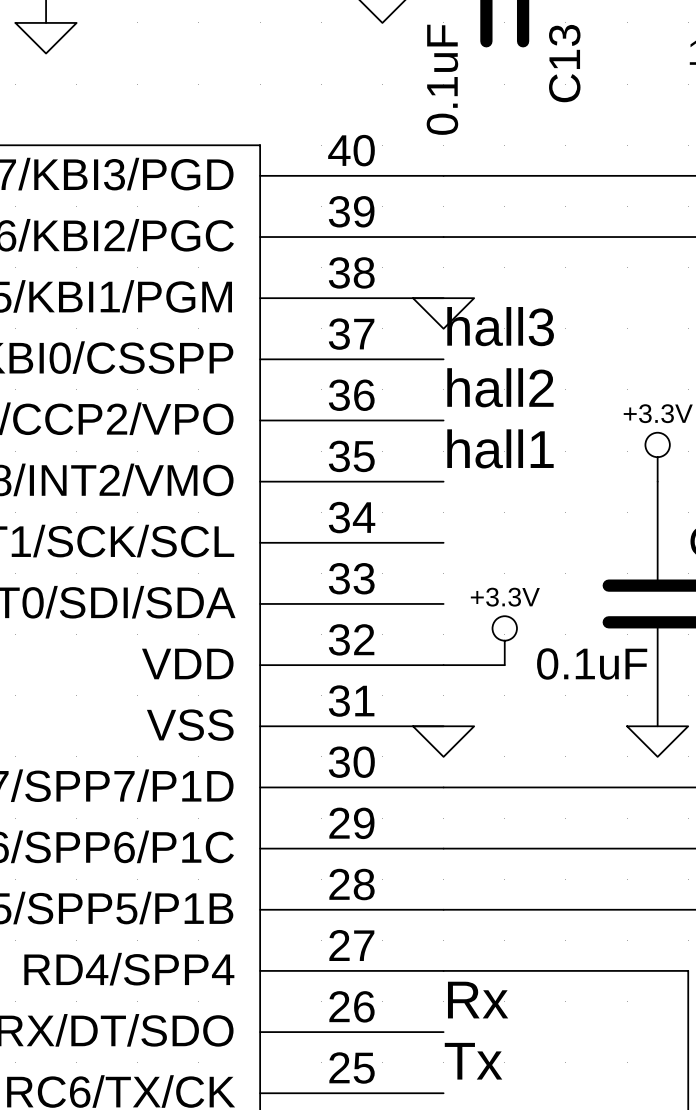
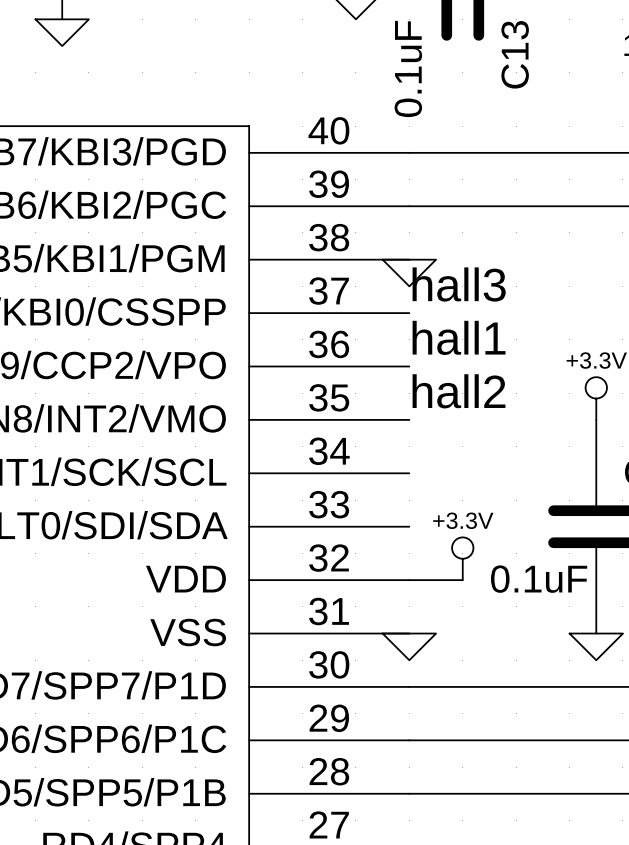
label: hall2 (500, 387) -> hall1 (459, 337)
label: hall1 (500, 448) -> hall2 (459, 391)

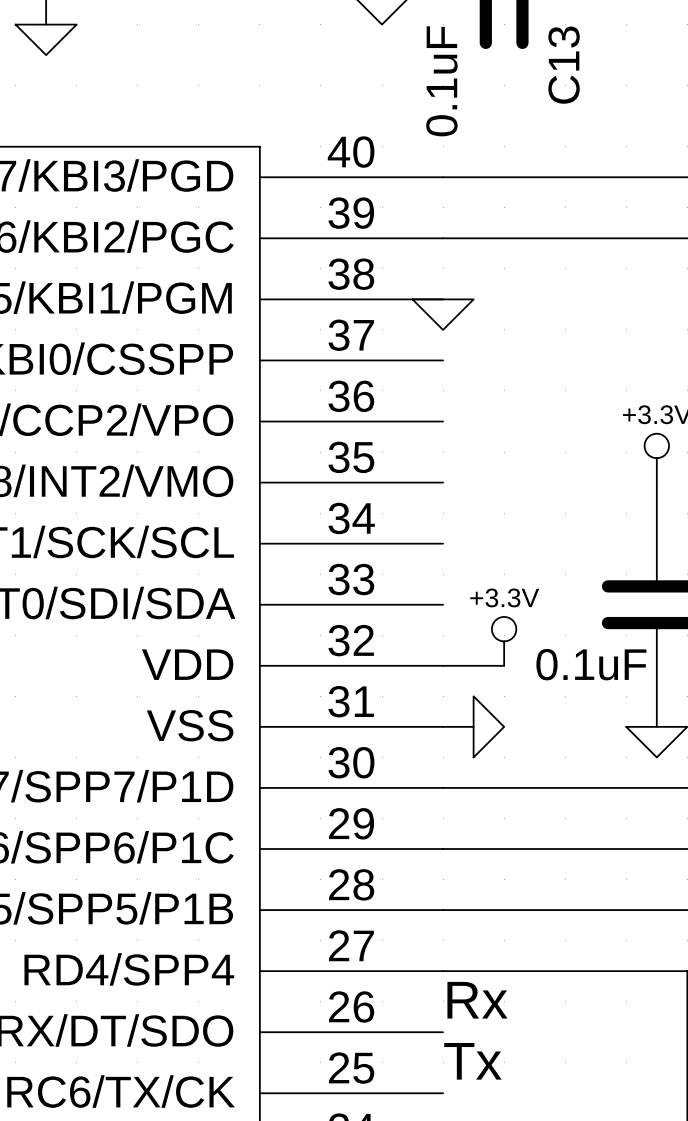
label: hall3 (459, 284) -> none
label: hall1 (459, 337) -> none
label: hall2 (459, 391) -> none
power symbol rotation: 0° (409, 646) -> 90° counterclockwise (488, 726)
power symbol position: (409, 646) -> (488, 726)

